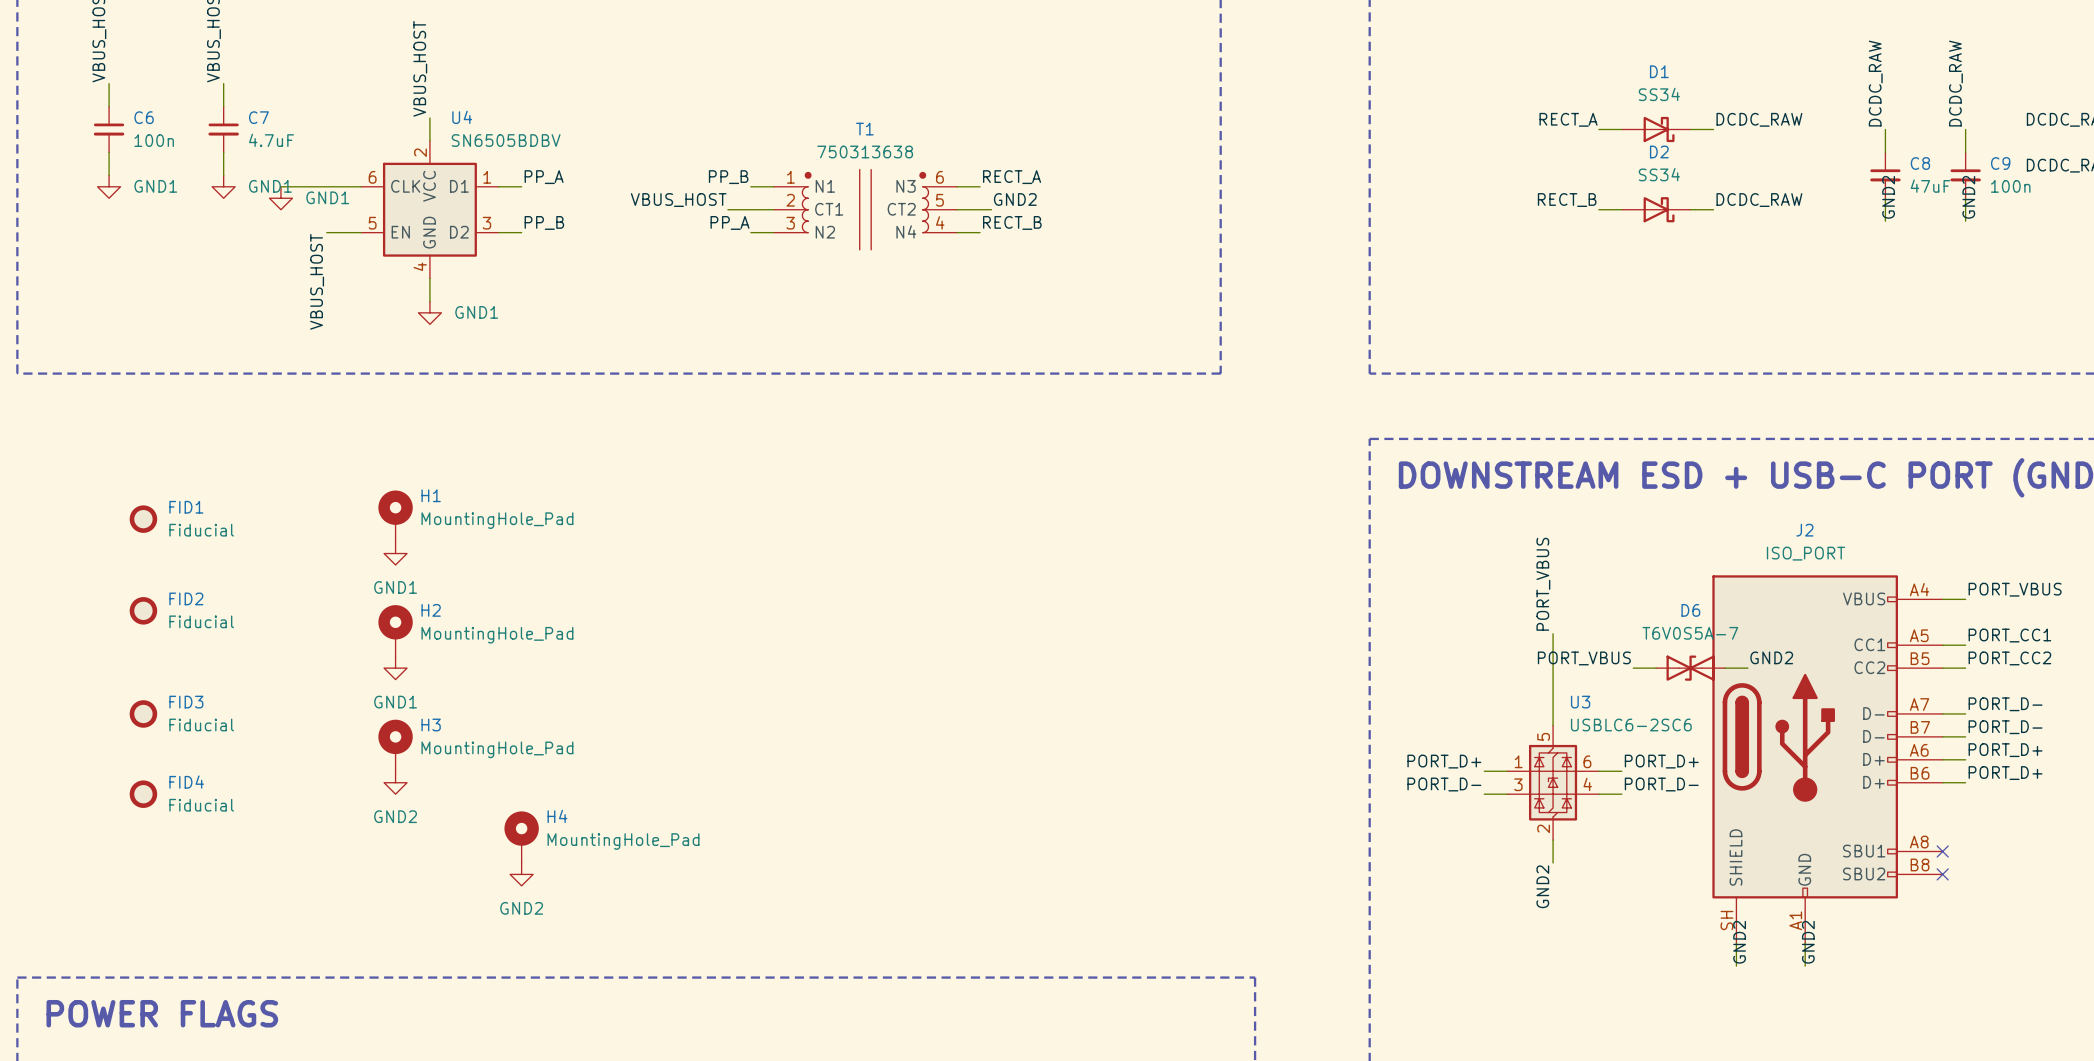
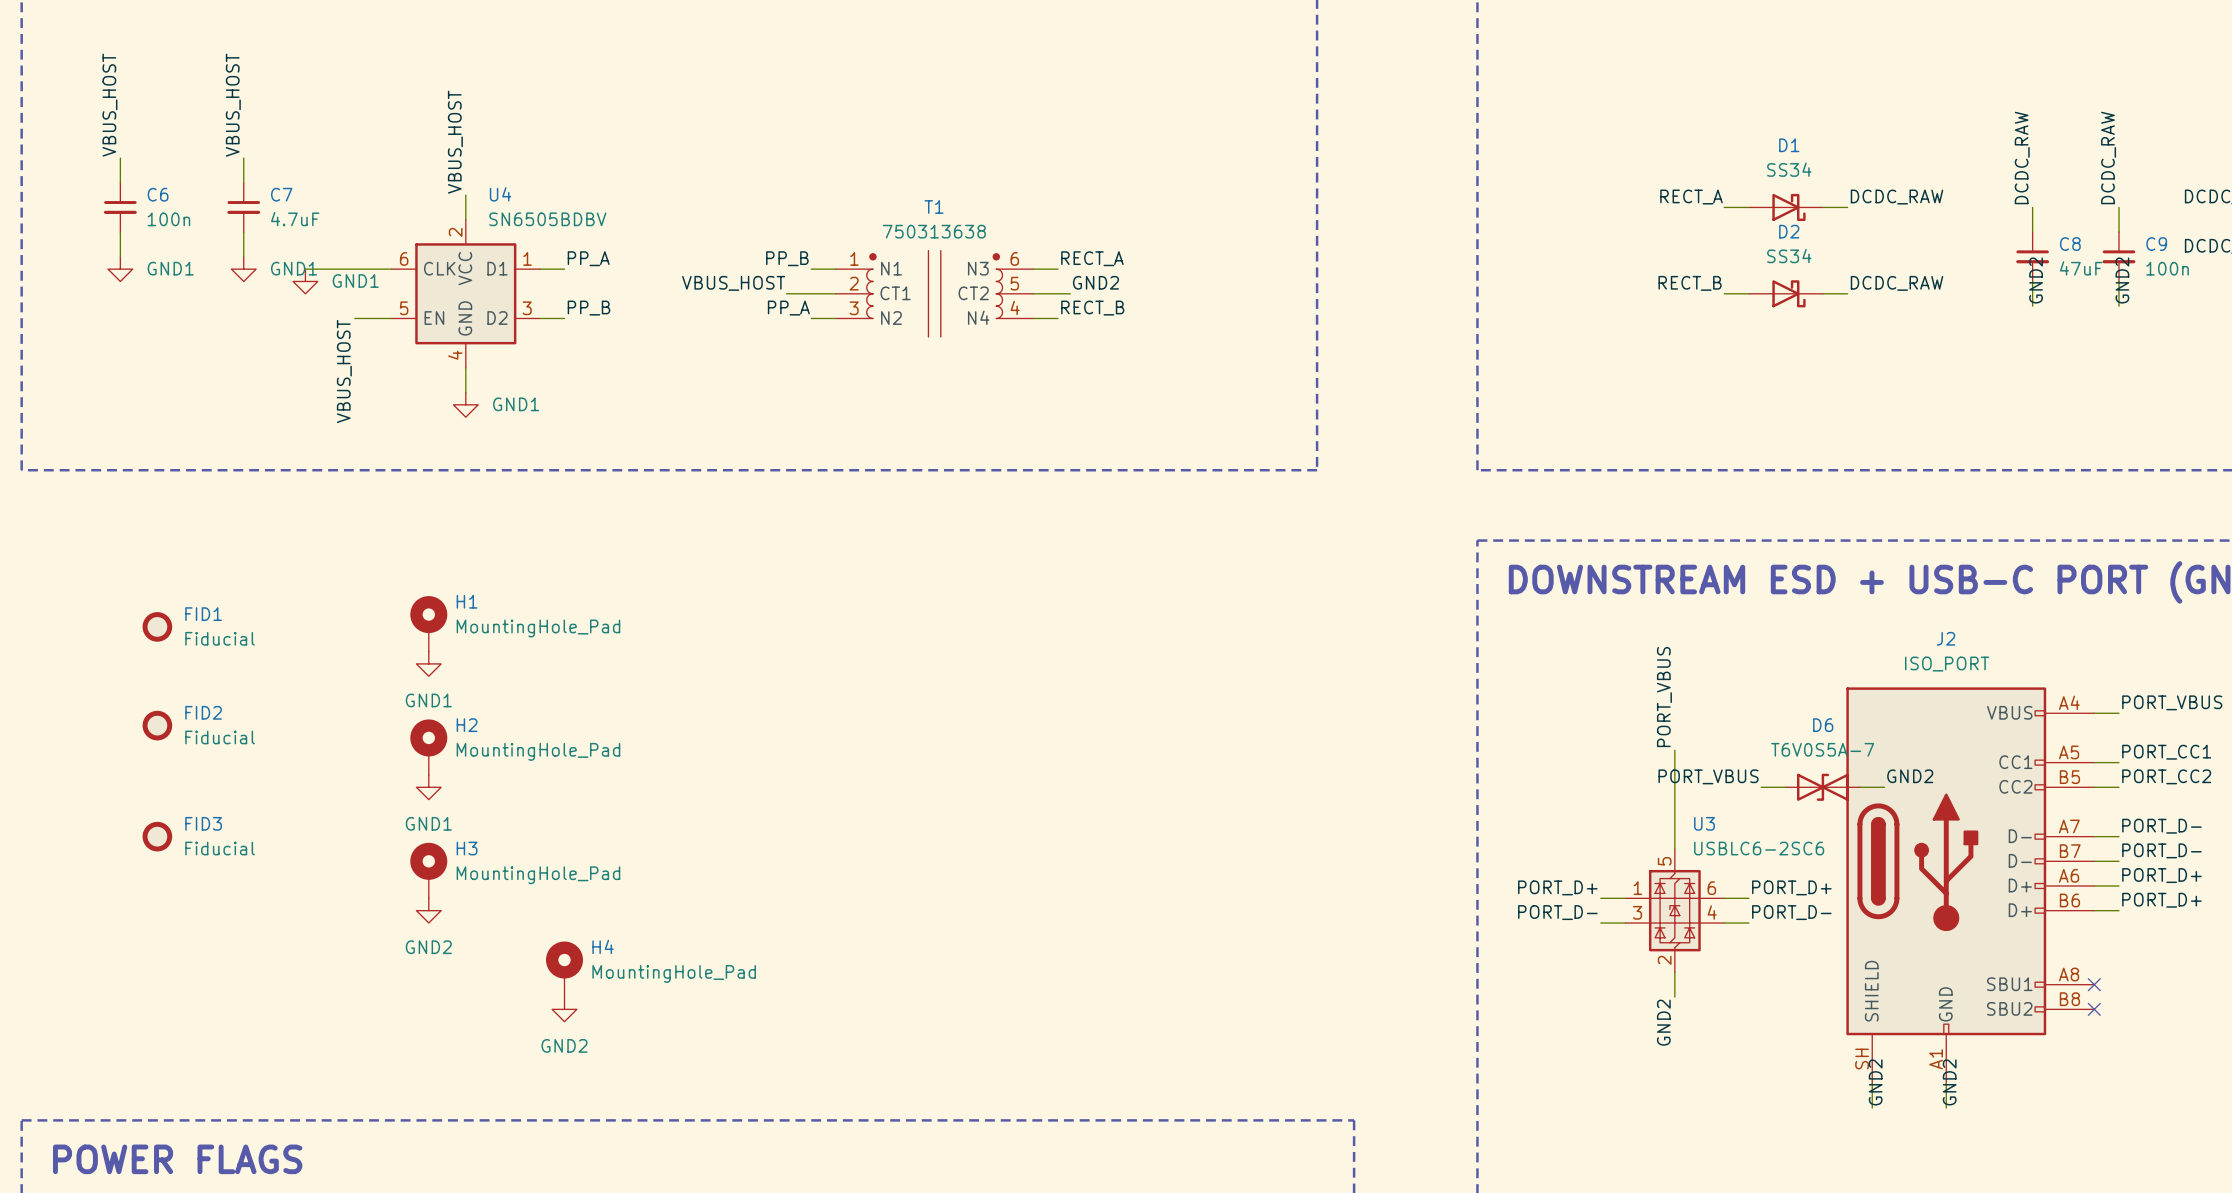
FID4: Fiducial (143, 794) -> none

